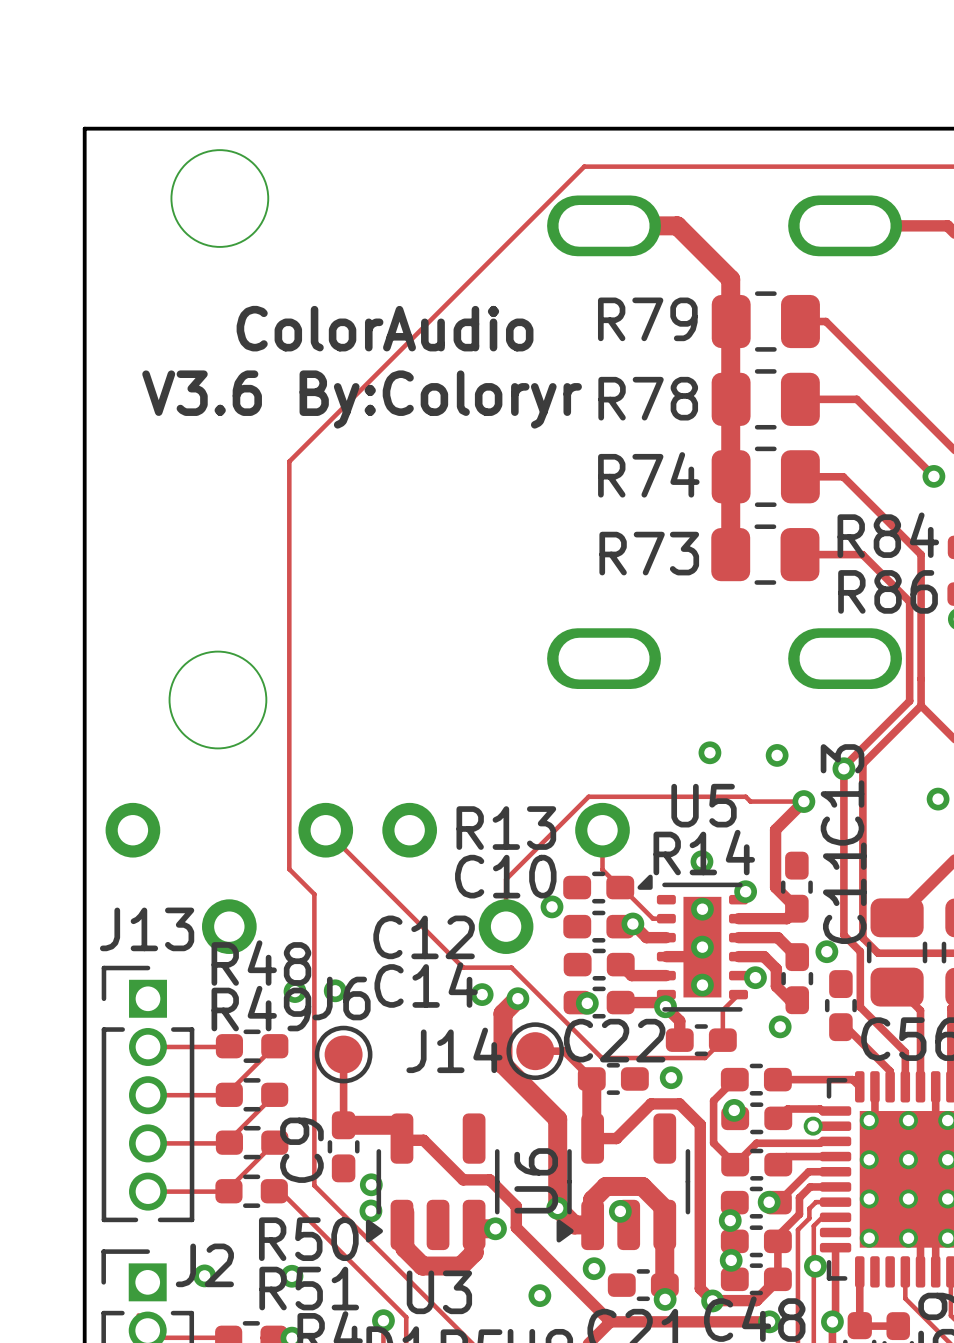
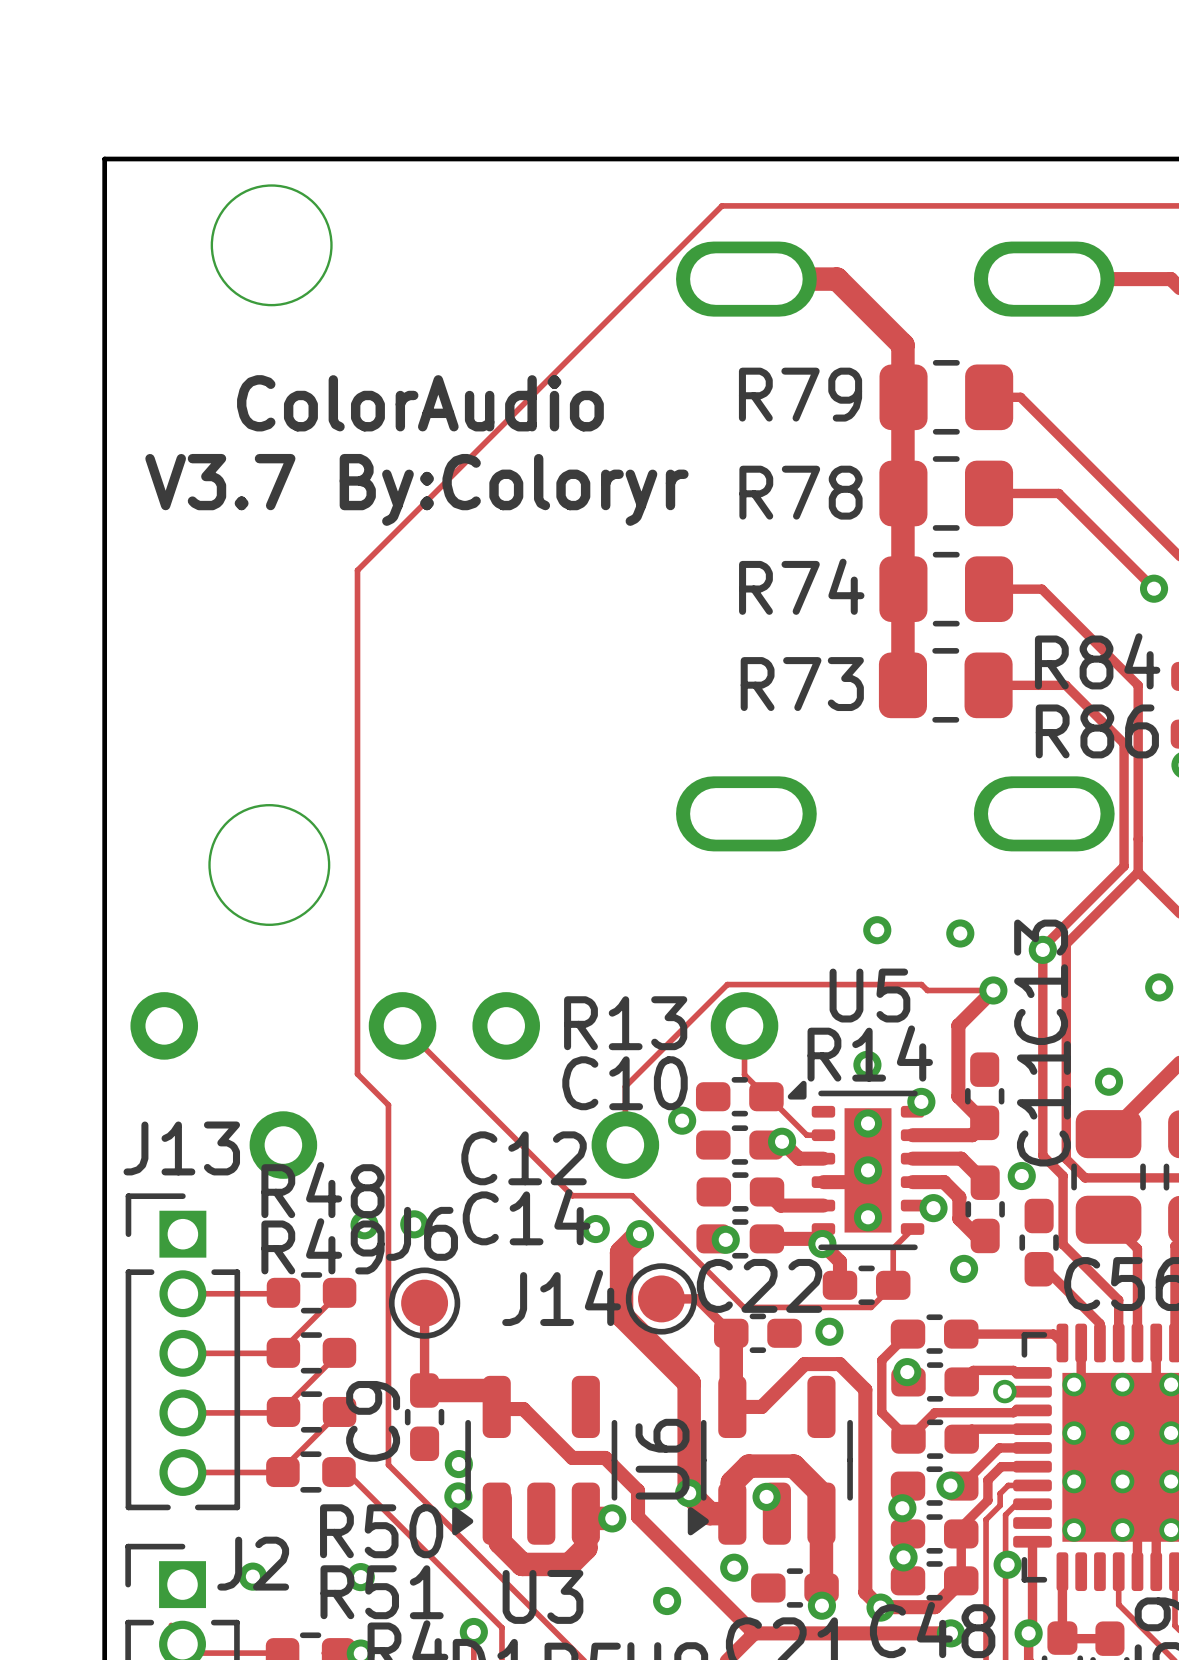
text position: ColorAudio (385, 328) -> ColorAudio (420, 403)
text: V3.6 By:Coloryr (362, 399) -> V3.7 By:Coloryr (416, 489)
via: none -> (1109, 1081)

